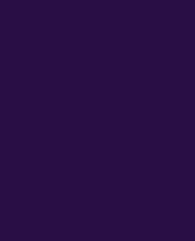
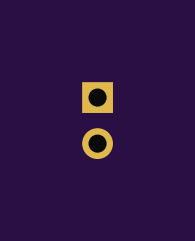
part: none -> (97, 120)

